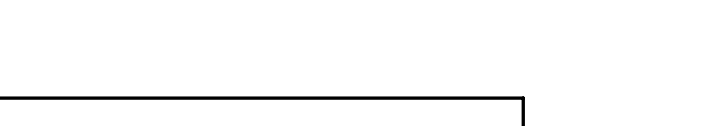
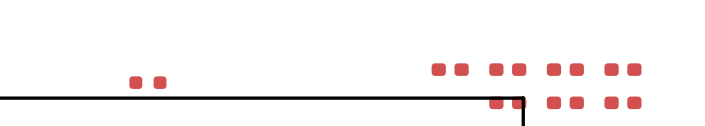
part: none -> (450, 69)
part: none -> (507, 69)
part: none -> (565, 69)
part: none -> (622, 69)
part: none -> (147, 82)
part: none -> (507, 102)
part: none -> (565, 102)
part: none -> (622, 102)

